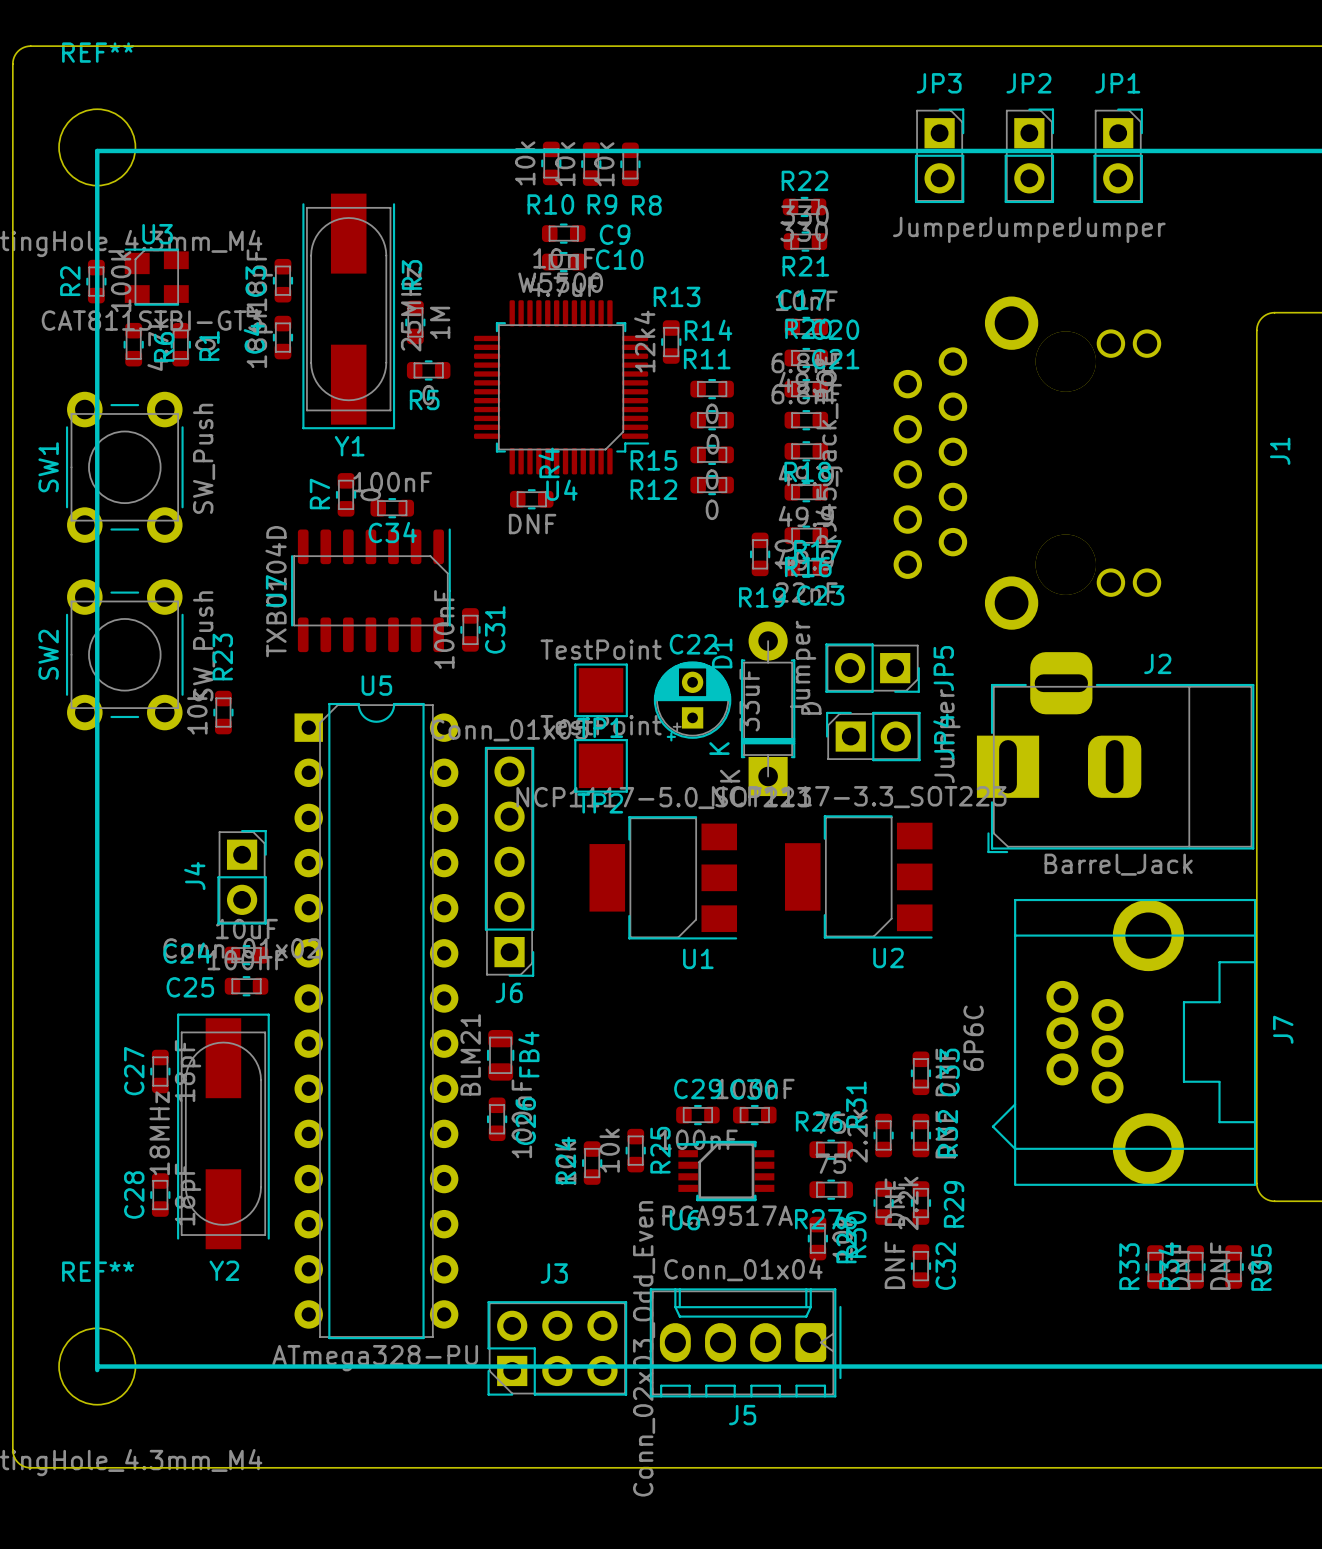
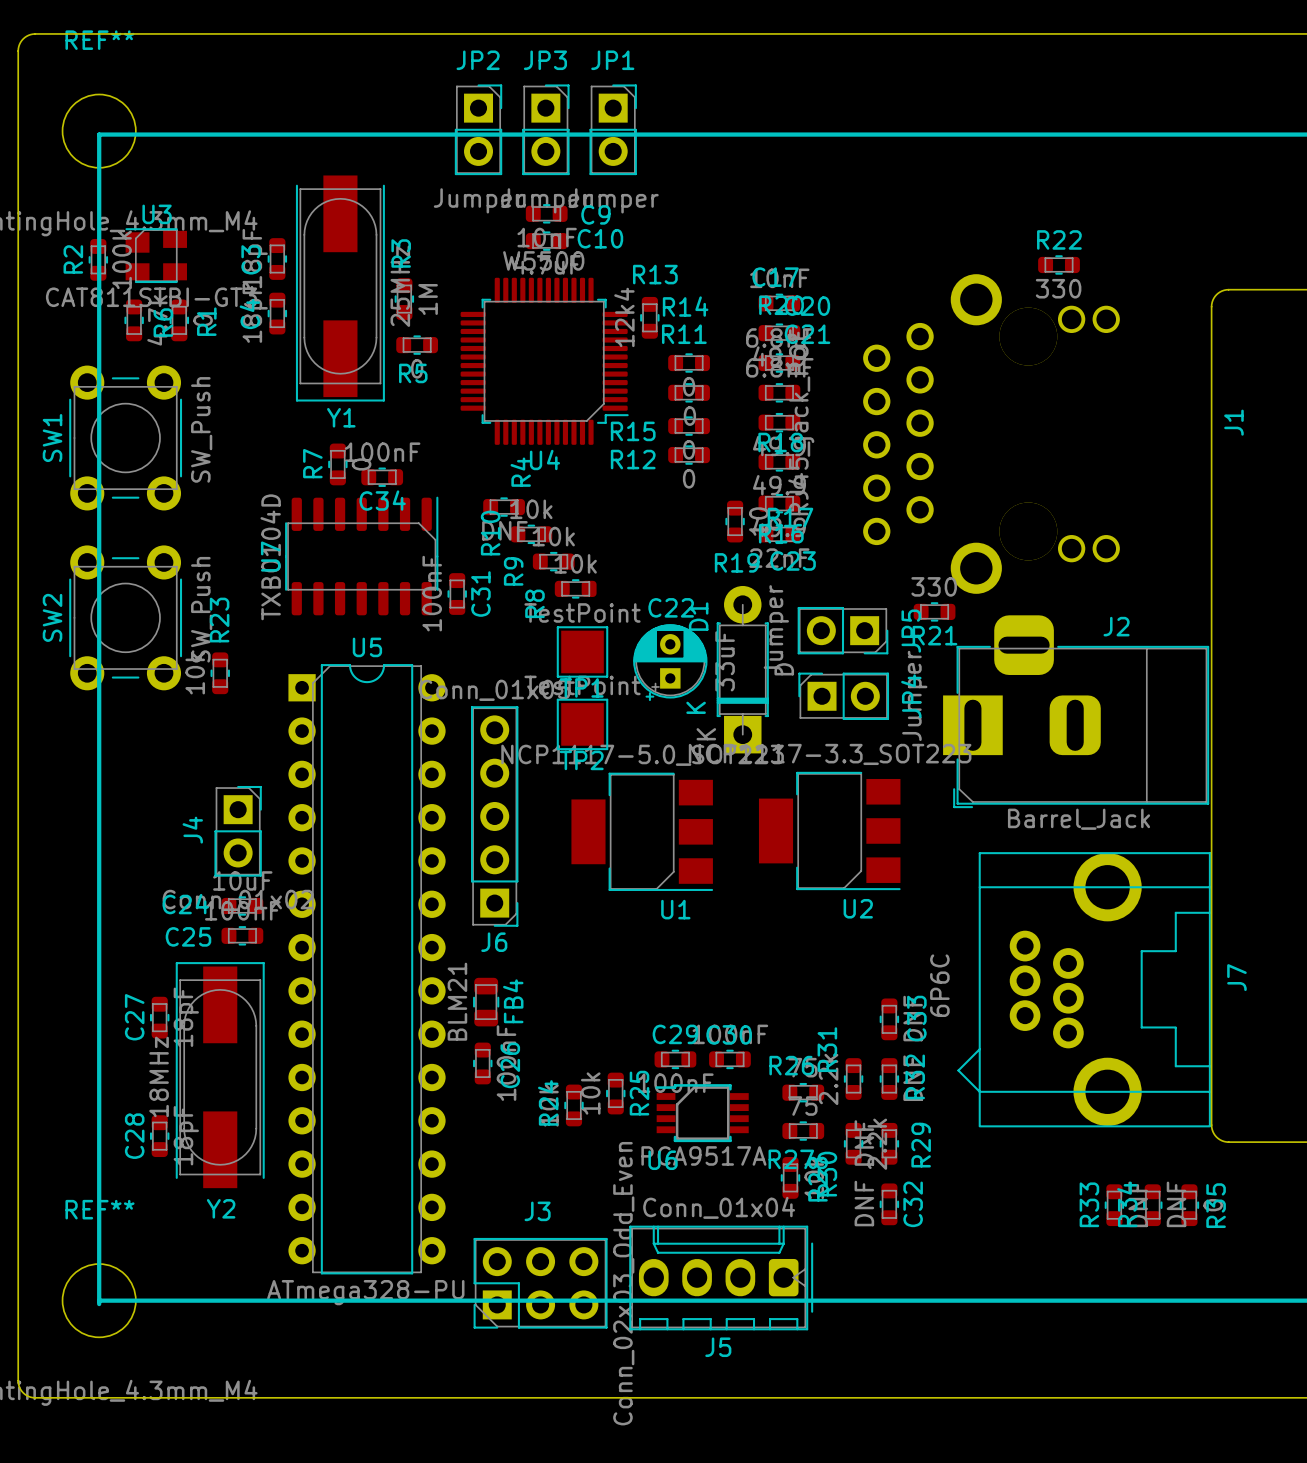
JP3 position: (939, 155) -> (545, 129)
JP2 position: (1029, 155) -> (478, 129)
JP1 position: (1118, 155) -> (613, 129)
R10 rotation: 0° (551, 163) -> 90° clockwise (531, 534)
R10 position: (551, 163) -> (531, 534)
R9 rotation: 0° (591, 164) -> 90° clockwise (553, 561)
R9 position: (591, 164) -> (553, 561)
R8 rotation: 0° (630, 164) -> 90° clockwise (575, 588)
R8 position: (630, 164) -> (575, 588)
R22 position: (804, 206) -> (1059, 264)
R21 position: (805, 241) -> (934, 611)
R4 position: (531, 499) -> (504, 507)

